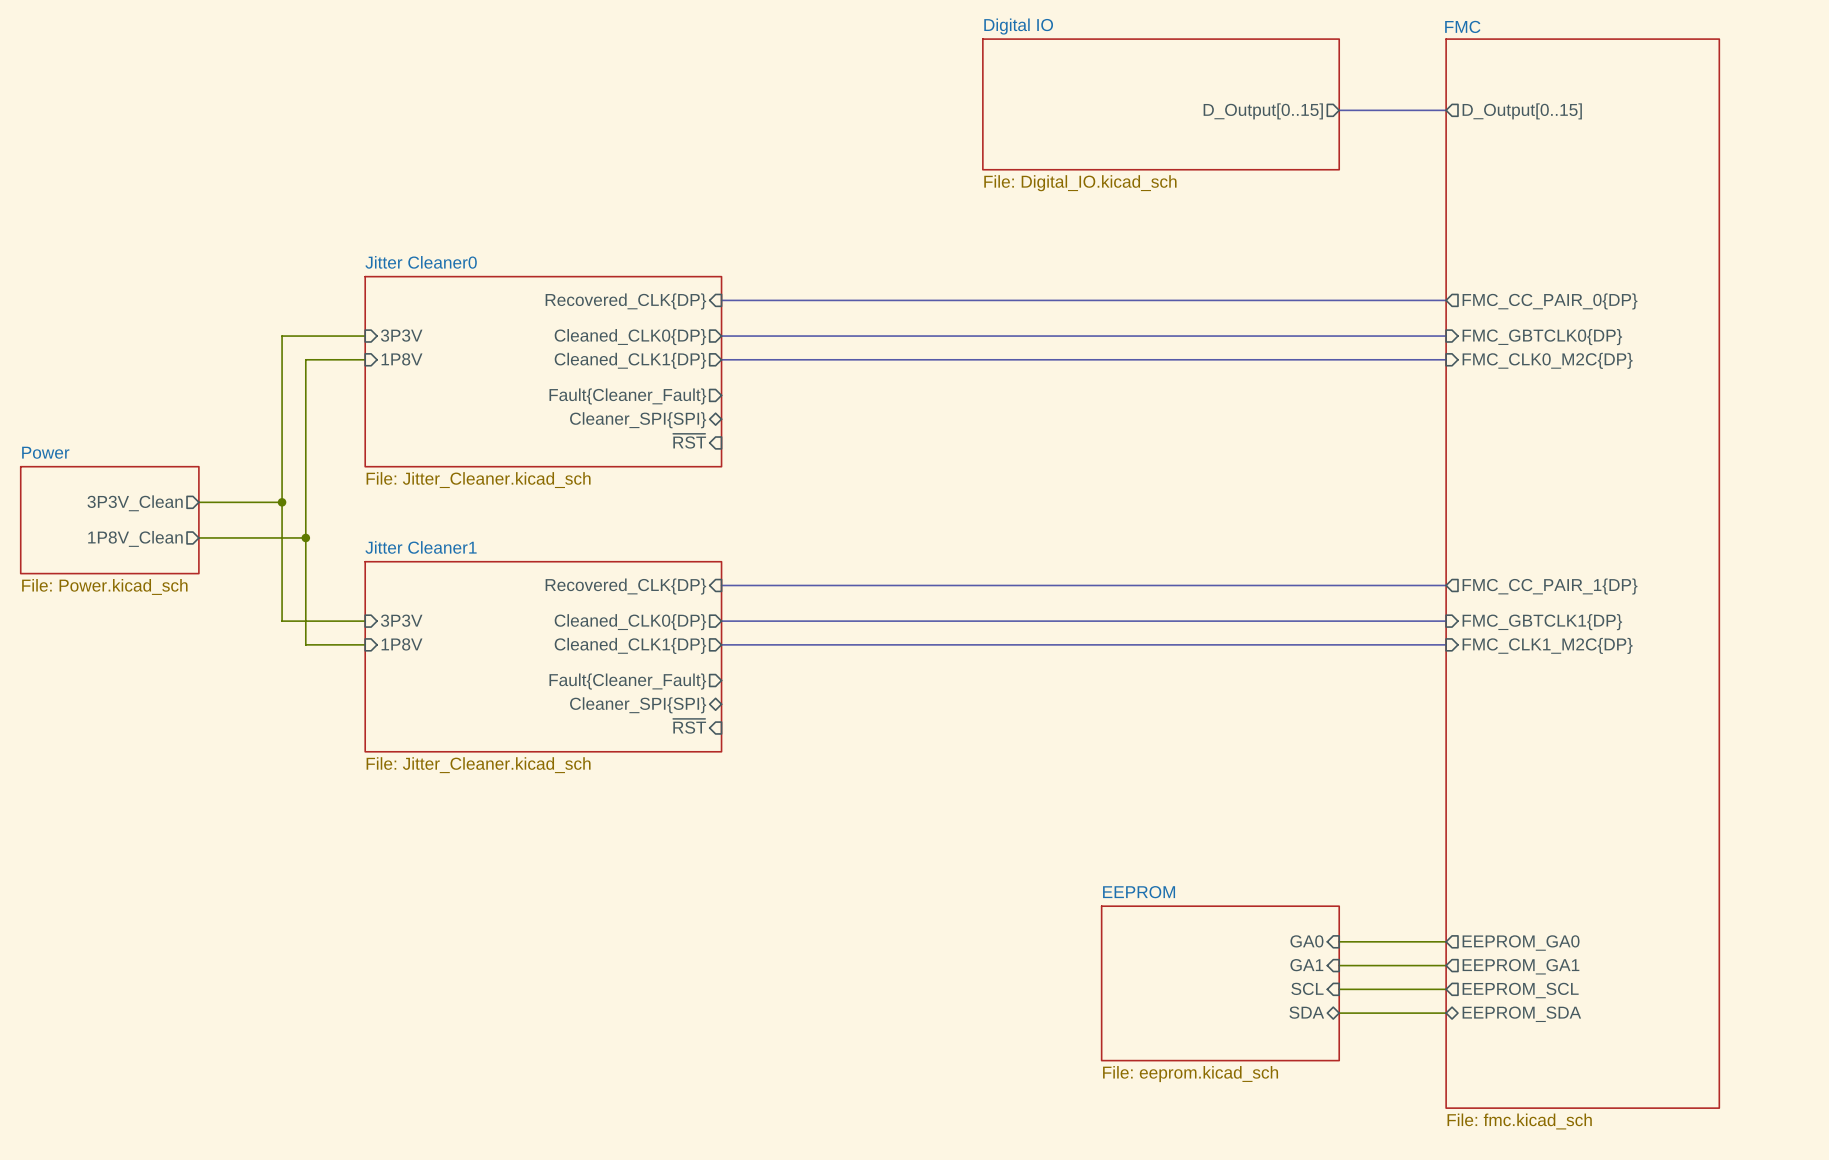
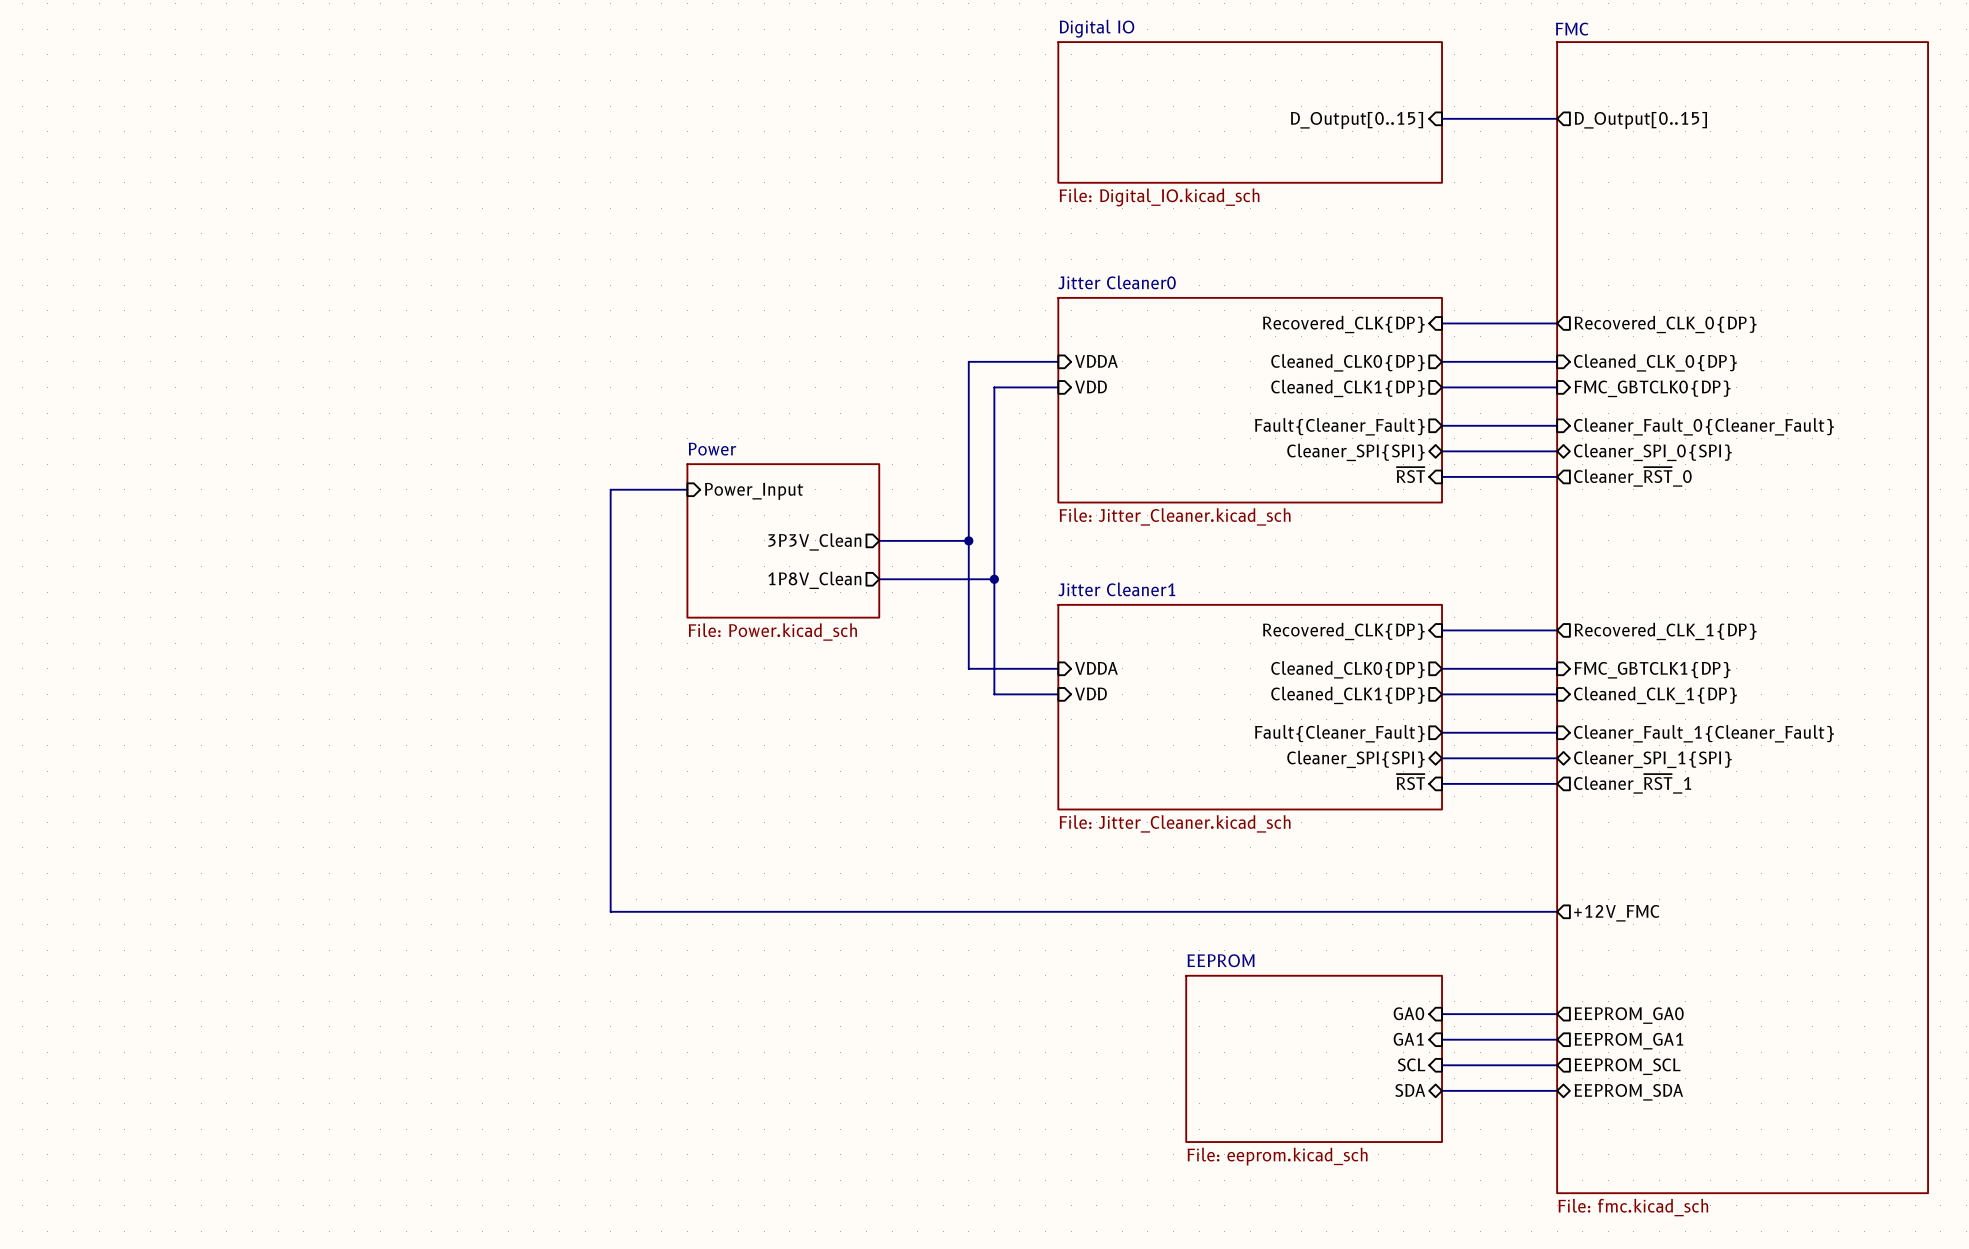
sheet pin shape: output (1263, 111) -> input (1357, 120)
bus: (721, 300) (1339, 300) -> none
sheet pin: Recovered_CLK{DP} (625, 301) -> none
sheet pin: none -> Recovered_CLK{DP} (1343, 324)
sheet pin: FMC_CC_PAIR_0{DP} (1550, 301) -> Recovered_CLK_0{DP} (1665, 324)
sheet pin: 3P3V (401, 335) -> none
sheet pin: none -> VDDA (1096, 361)
wire: (365, 336) (282, 336) (282, 621) (365, 621) -> none
bus: (721, 336) (1339, 336) -> none
wire: none -> (1058, 361) (968, 361) (968, 668) (1058, 668)
sheet pin: Cleaned_CLK0{DP} (630, 337) -> none
sheet pin: none -> Cleaned_CLK0{DP} (1348, 362)
sheet pin: FMC_GBTCLK0{DP} (1542, 337) -> Cleaned_CLK_0{DP} (1655, 362)
wire: (365, 359) (305, 359) (305, 644) (365, 644) -> none
sheet pin: 1P8V (402, 359) -> none
bus: (721, 359) (1339, 359) -> none
wire: none -> (1058, 387) (994, 387) (994, 694) (1058, 694)
sheet pin: none -> VDD (1090, 387)
sheet pin: Cleaned_CLK1{DP} (630, 360) -> none
sheet pin: none -> Cleaned_CLK1{DP} (1348, 388)
sheet pin: FMC_CLK0_M2C{DP} (1547, 360) -> FMC_GBTCLK0{DP} (1652, 388)
sheet Jitter Cleaner0 position: (543, 371) -> (1250, 400)
bus: none -> (1442, 425) (1557, 425)
sheet pin: Fault{Cleaner_Fault} (627, 396) -> none
sheet pin: none -> Fault{Cleaner_Fault} (1339, 426)
sheet pin: none -> Cleaner_Fault_0{Cleaner_Fault} (1704, 426)
bus: none -> (1442, 451) (1557, 451)
sheet pin: Cleaner_SPI{SPI} (638, 420) -> none
sheet pin: none -> Cleaner_SPI{SPI} (1355, 452)
sheet pin: none -> Cleaner_SPI_0{SPI} (1652, 452)
sheet pin: ~{RST} (689, 441) -> none
sheet pin: none -> ~{RST} (1410, 475)
wire: none -> (1442, 476) (1557, 476)
sheet pin: none -> Cleaner_~{RST}_0 (1632, 476)
wire: none -> (687, 489) (610, 489) (610, 911) (1557, 911)
sheet pin: none -> Power_Input (754, 491)
wire: (198, 502) (282, 502) -> none
junction: (282, 502) -> none
sheet Power: none -> File: Power.kicad_sch (783, 540)
wire: none -> (879, 540) (968, 540)
junction: none -> (968, 540)
sheet pin: 3P3V_Clean (135, 503) -> none
sheet pin: none -> 3P3V_Clean (814, 541)
sheet Power: File: Power.kicad_sch (109, 520) -> none
wire: (198, 537) (305, 537) -> none
junction: (305, 537) -> none
wire: none -> (879, 579) (994, 579)
junction: none -> (994, 579)
sheet pin: 1P8V_Clean (135, 538) -> none
sheet pin: none -> 1P8V_Clean (814, 580)
sheet FMC: File: fmc.kicad_sch (1582, 573) -> none
sheet FMC: none -> File: fmc.kicad_sch (1742, 617)
bus: (721, 585) (1339, 585) -> none
sheet pin: Recovered_CLK{DP} (625, 586) -> none
sheet pin: none -> Recovered_CLK{DP} (1343, 631)
sheet pin: FMC_CC_PAIR_1{DP} (1550, 586) -> Recovered_CLK_1{DP} (1665, 631)
sheet pin: 3P3V (401, 620) -> none
sheet pin: none -> VDDA (1096, 668)
bus: (721, 621) (1339, 621) -> none
sheet pin: Cleaned_CLK0{DP} (630, 622) -> none
sheet pin: none -> Cleaned_CLK0{DP} (1348, 669)
sheet pin: 1P8V (402, 644) -> none
bus: (721, 644) (1339, 644) -> none
sheet pin: none -> VDD (1090, 693)
sheet pin: Cleaned_CLK1{DP} (630, 645) -> none
sheet pin: none -> Cleaned_CLK1{DP} (1348, 695)
sheet pin: FMC_CLK1_M2C{DP} (1547, 645) -> Cleaned_CLK_1{DP} (1655, 695)
sheet Jitter Cleaner1 position: (543, 656) -> (1250, 707)
bus: none -> (1442, 732) (1557, 732)
sheet pin: Fault{Cleaner_Fault} (627, 681) -> none
sheet pin: none -> Fault{Cleaner_Fault} (1339, 733)
sheet pin: none -> Cleaner_Fault_1{Cleaner_Fault} (1704, 733)
bus: none -> (1442, 758) (1557, 758)
sheet pin: Cleaner_SPI{SPI} (638, 705) -> none
sheet pin: none -> Cleaner_SPI{SPI} (1355, 759)
sheet pin: none -> Cleaner_SPI_1{SPI} (1652, 759)
sheet pin: ~{RST} (689, 726) -> none
sheet pin: none -> ~{RST} (1410, 782)
sheet pin: none -> Cleaner_~{RST}_1 (1632, 783)
wire: none -> (1442, 783) (1557, 783)
sheet pin: none -> +12V_FMC (1616, 913)

